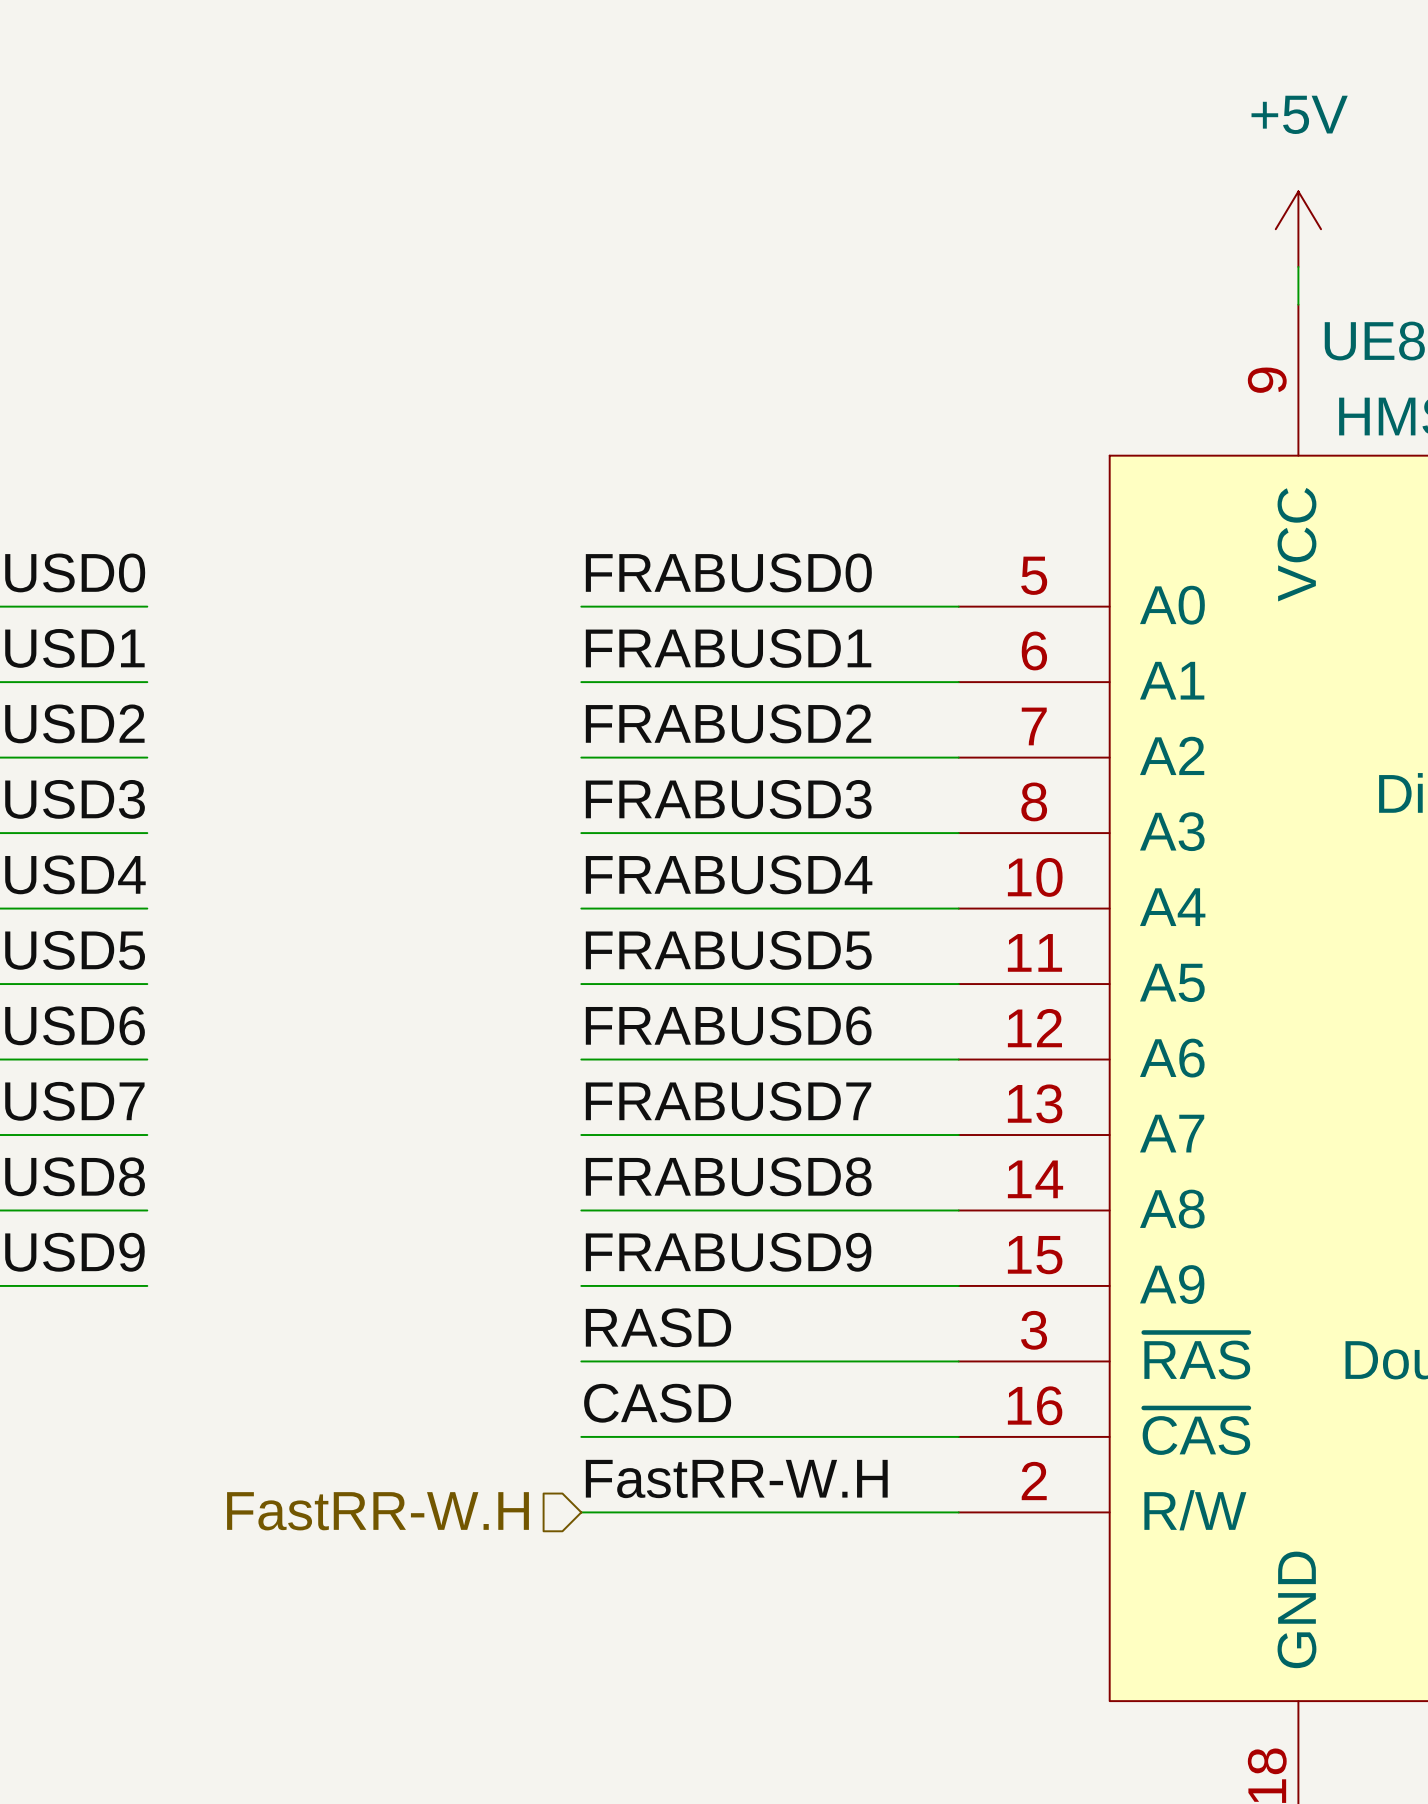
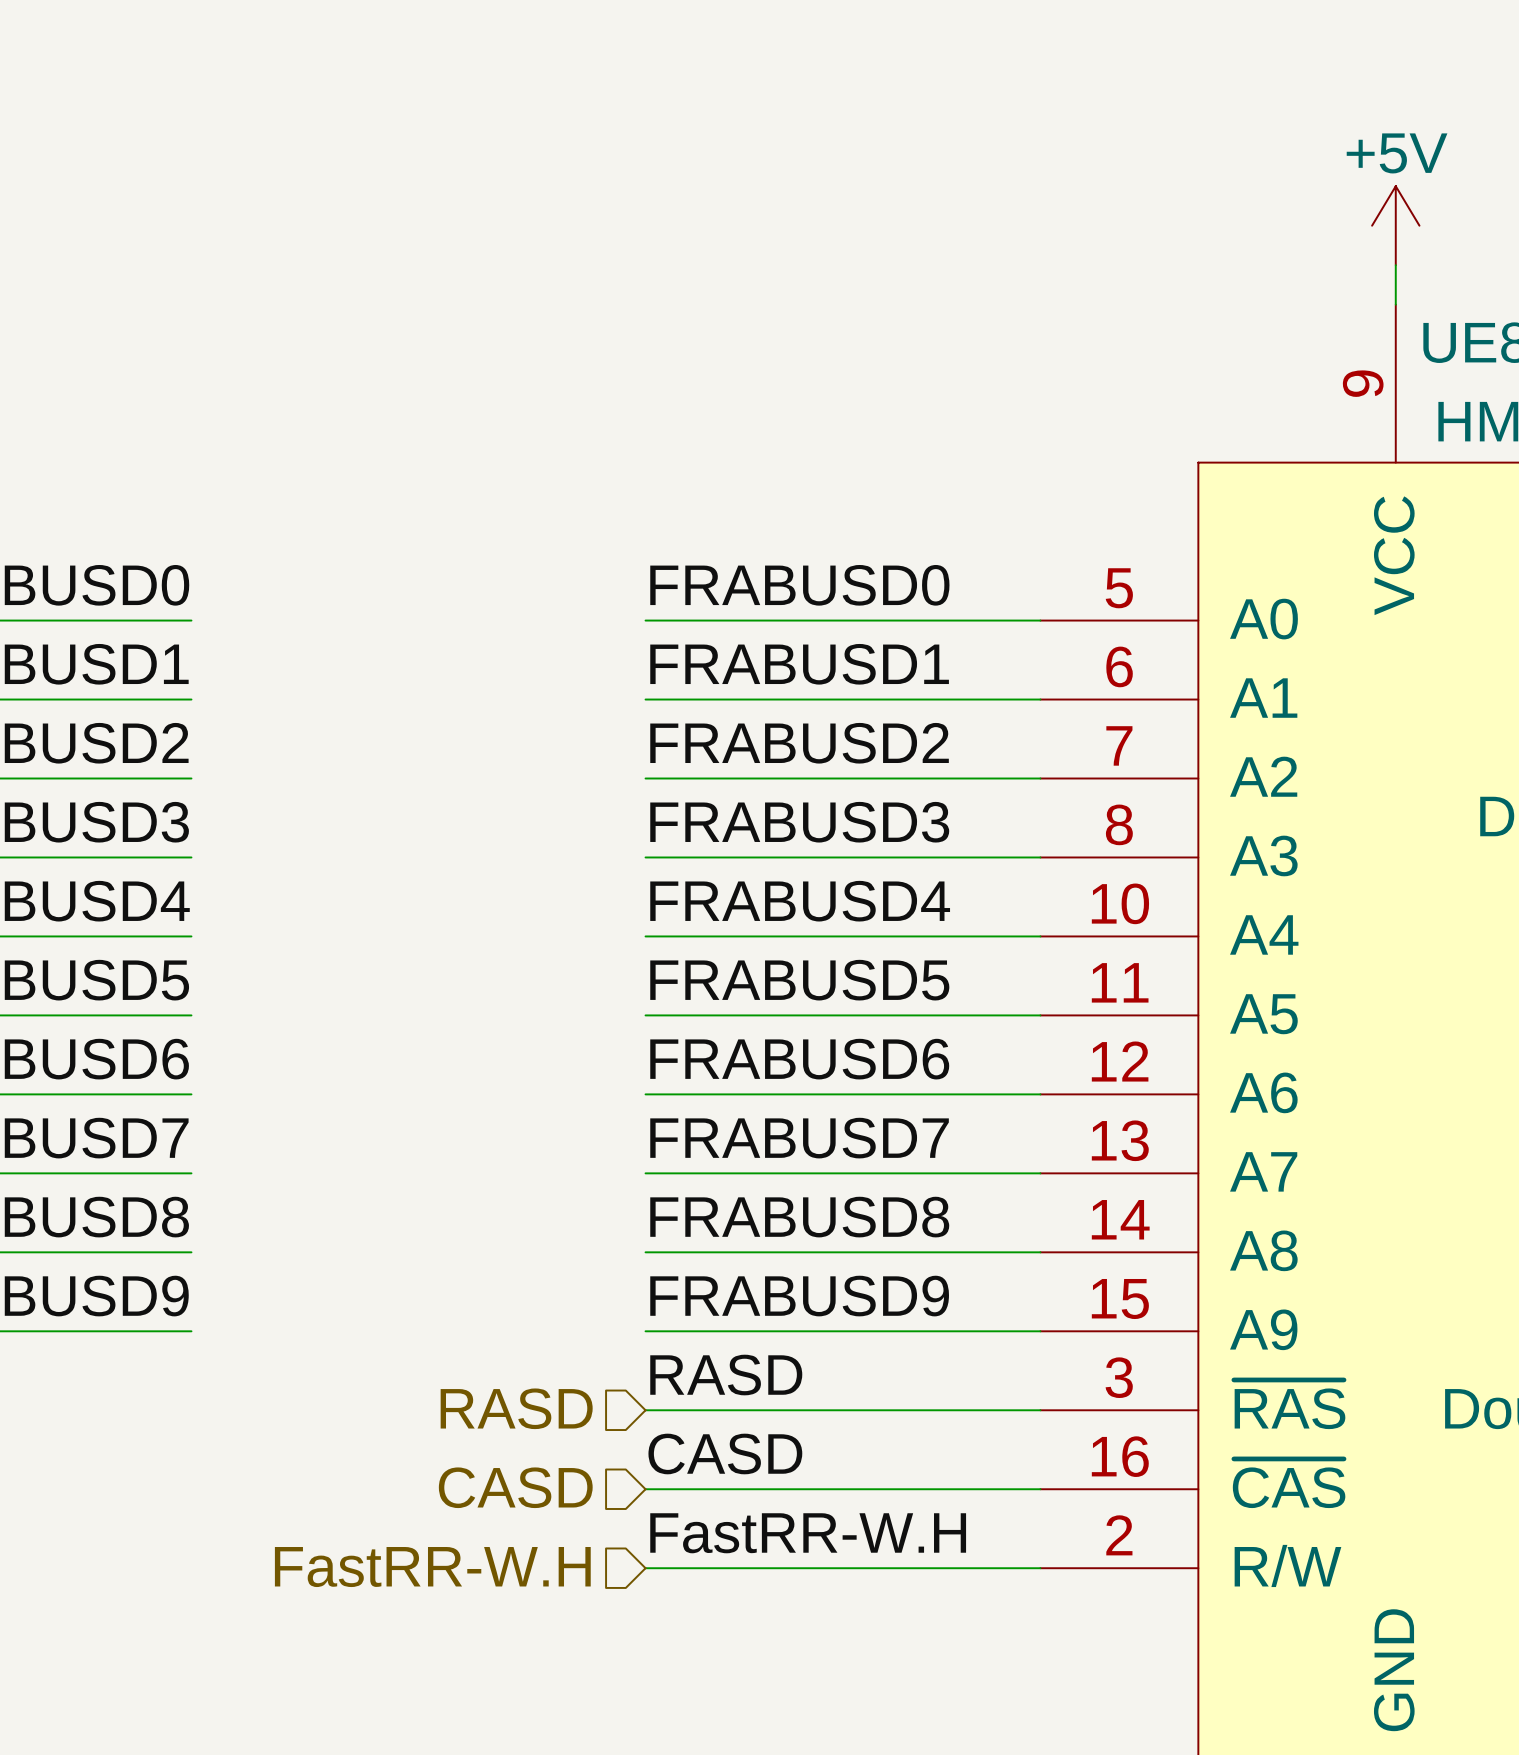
power symbol text position: +5V (1299, 114) -> +5V (1397, 153)
hierarchical label: none -> RASD (516, 1408)
hierarchical label: none -> CASD (515, 1487)

